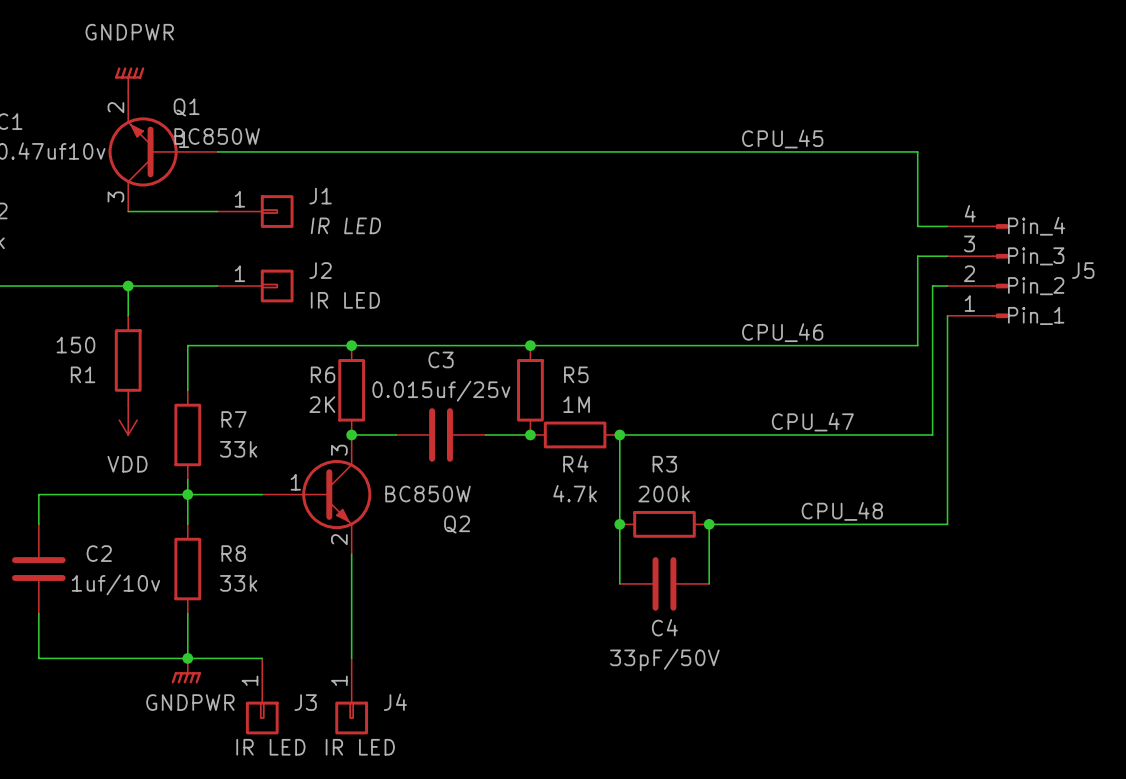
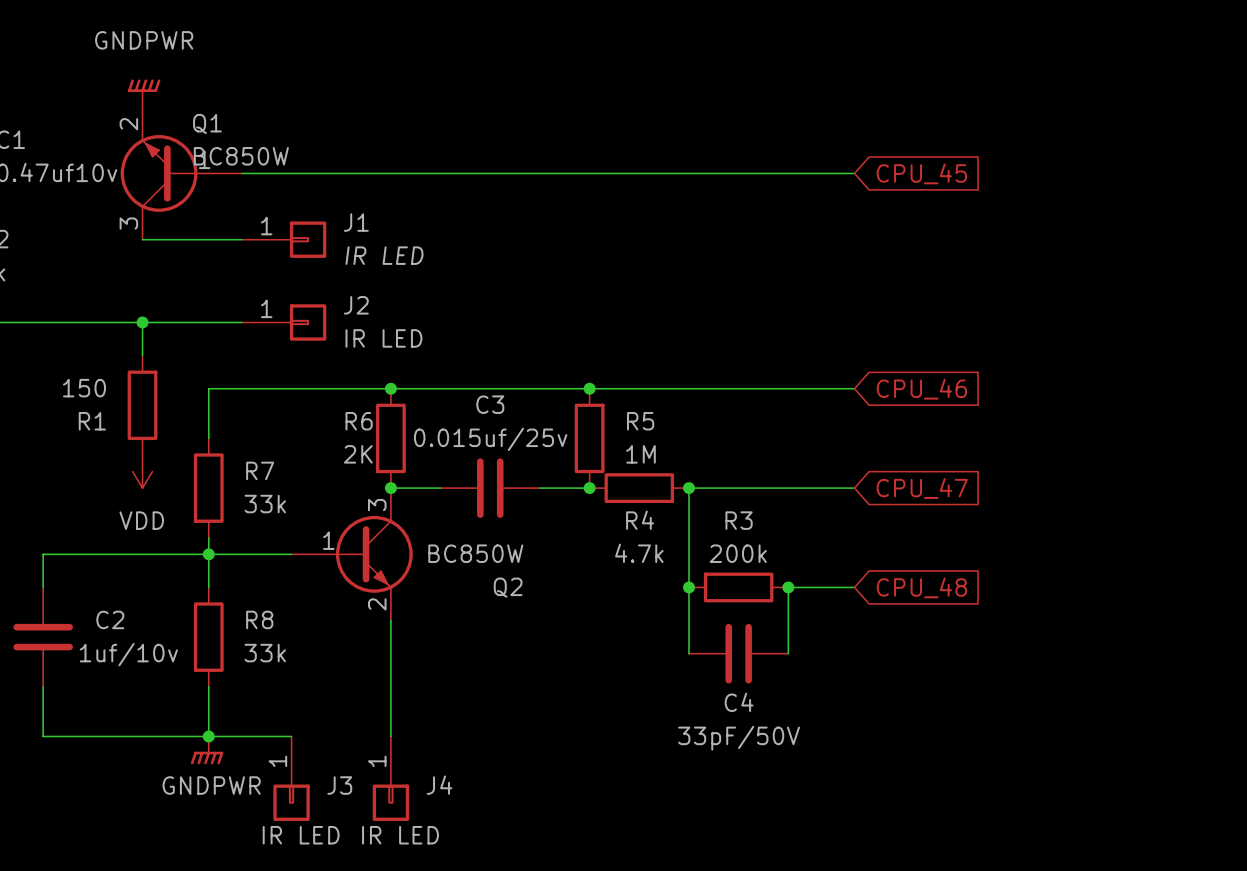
label: CPU_45 (782, 139) -> none
wire: (768, 151) (917, 151) (917, 226) (947, 226) -> none
global label: none -> CPU_45 (921, 173)
wire: (947, 256) (917, 256) (917, 345) (768, 345) -> none
J5: (977, 271) -> none
wire: (947, 286) (932, 286) (932, 434) (768, 434) -> none
wire: (947, 315) (947, 524) (768, 524) -> none
label: CPU_46 (782, 332) -> none
global label: none -> CPU_46 (921, 389)
label: CPU_47 (812, 422) -> none
global label: none -> CPU_47 (922, 488)
label: CPU_48 (842, 511) -> none
global label: none -> CPU_48 (921, 587)

